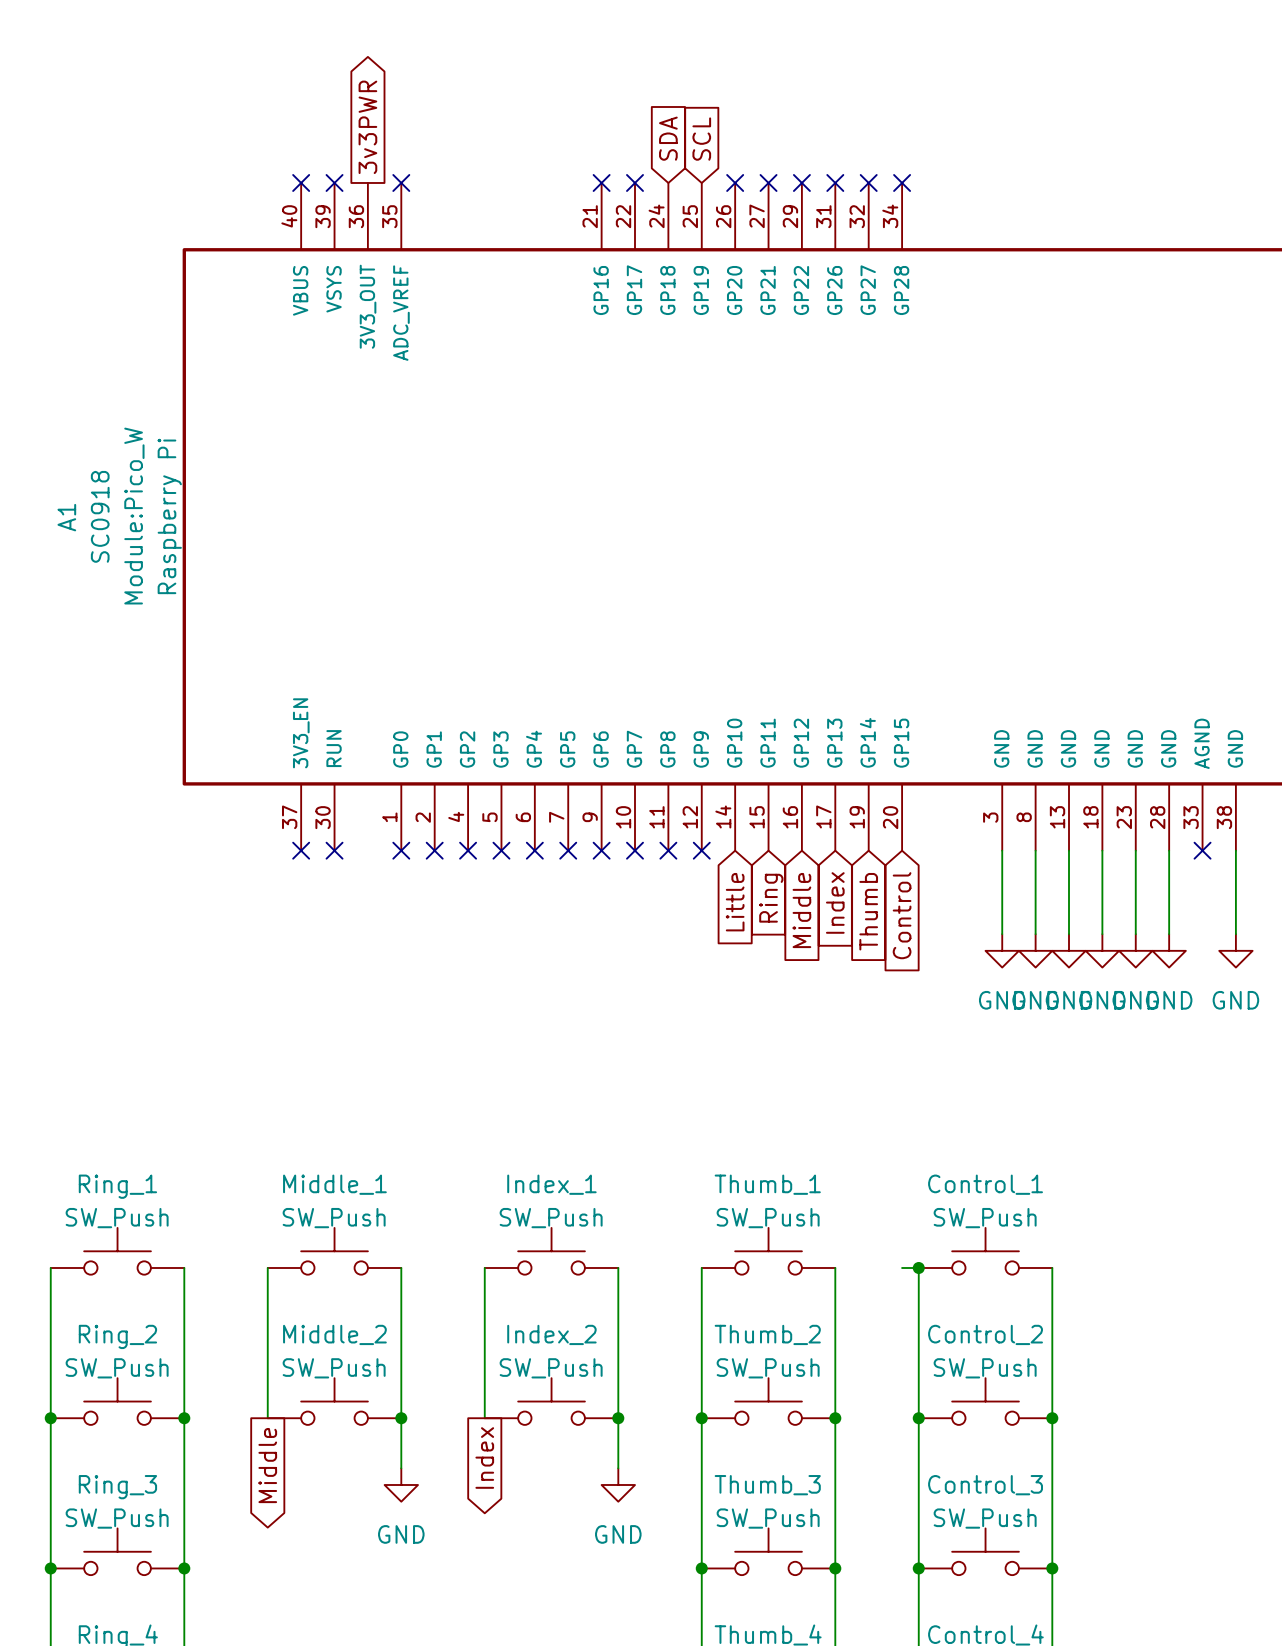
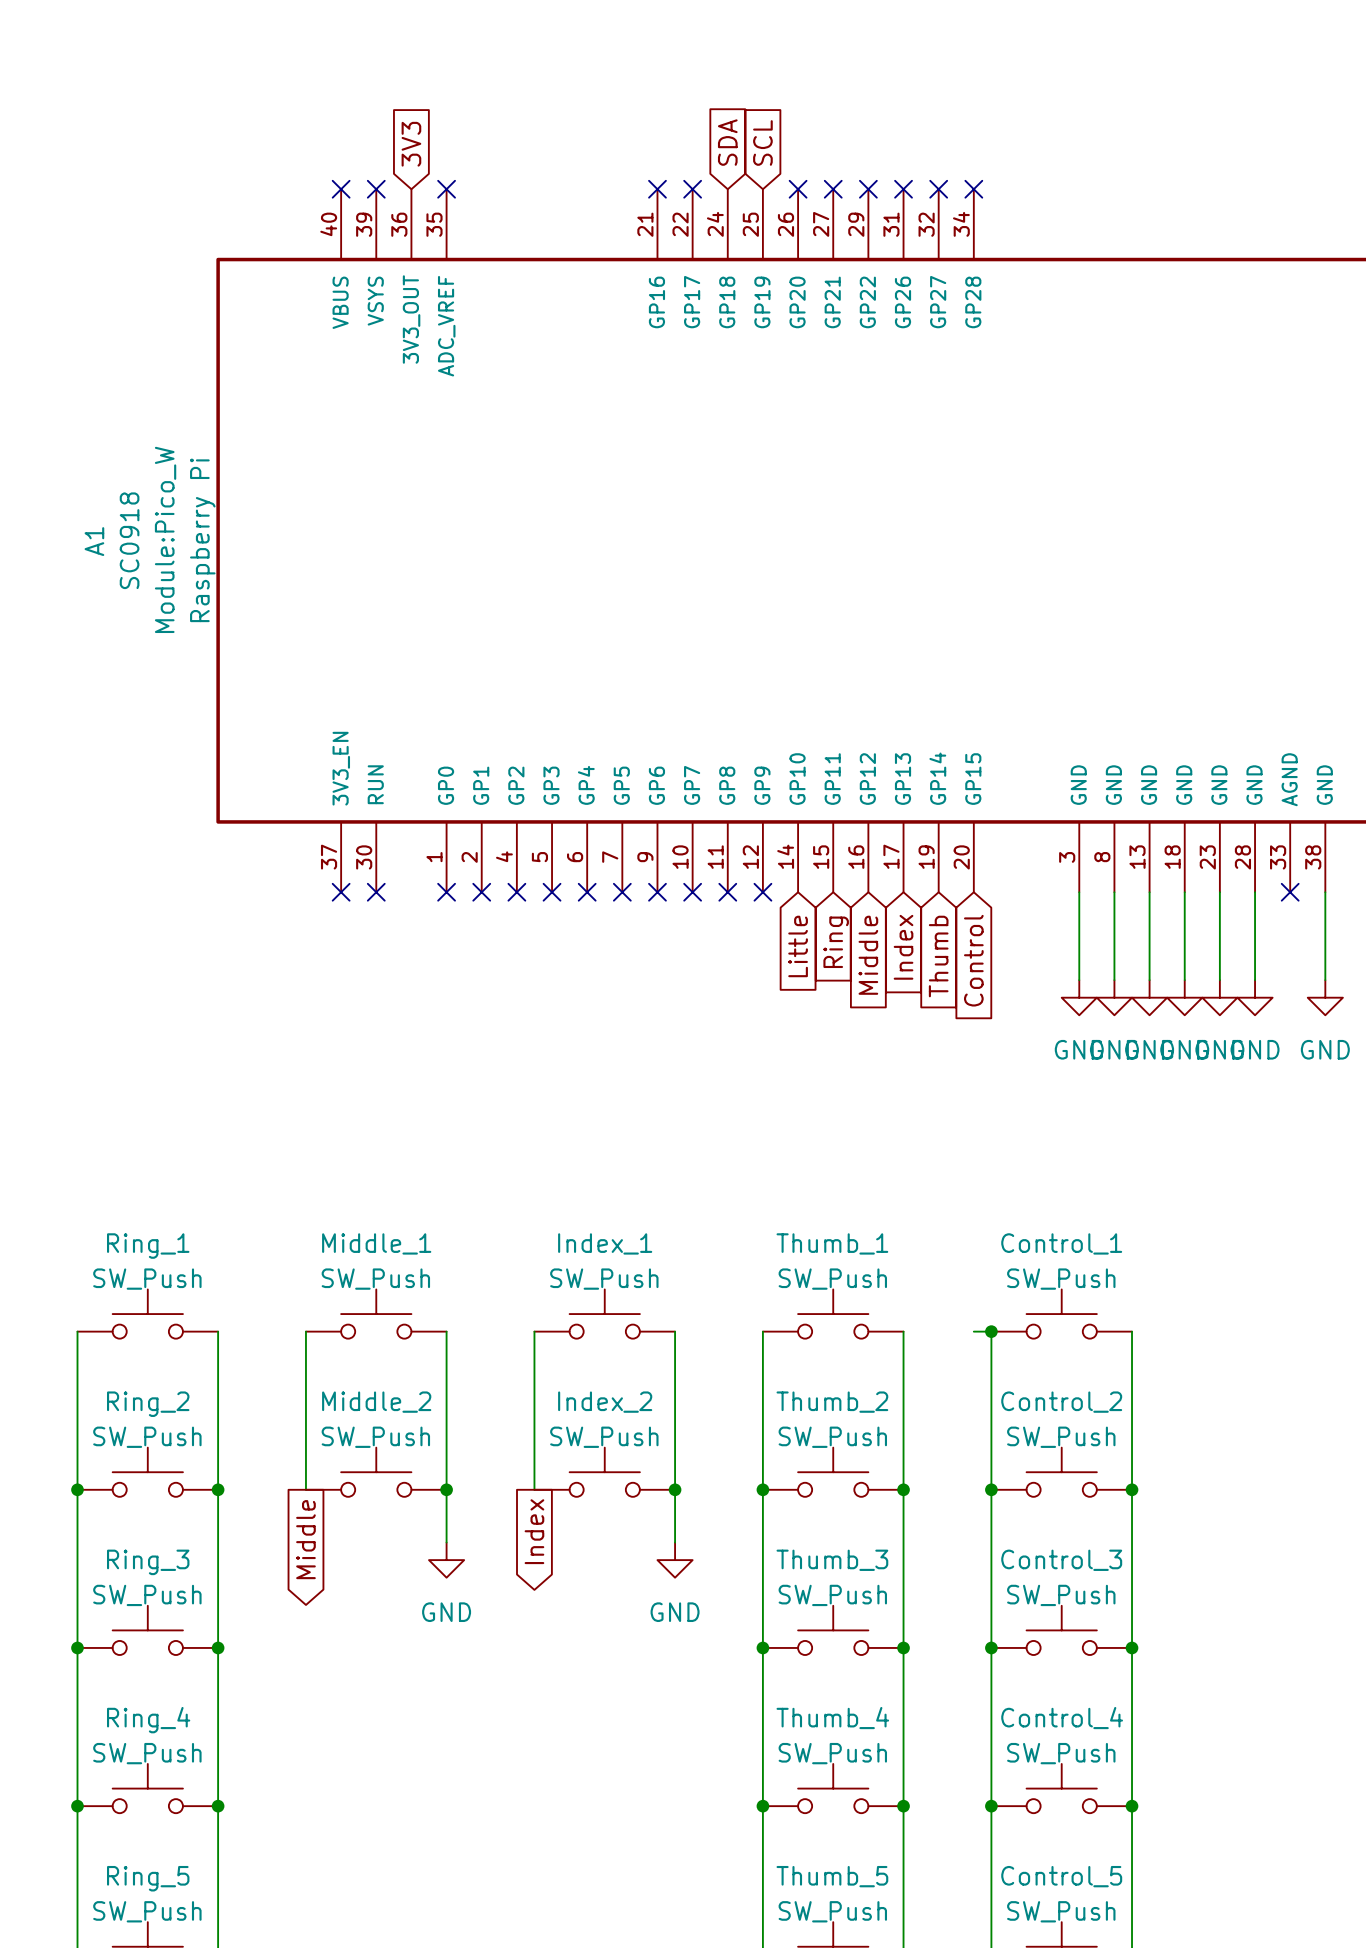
global label shape: output (367, 127) -> input (411, 144)
global label: 3v3PWR (367, 127) -> 3V3 (411, 144)

